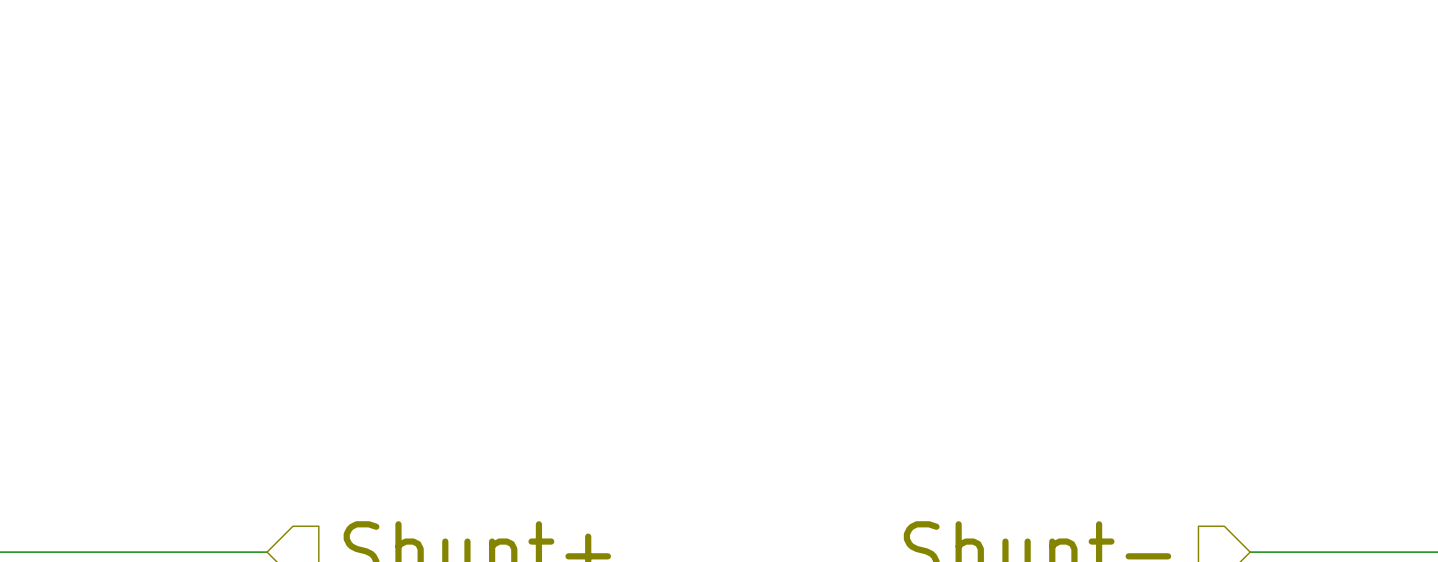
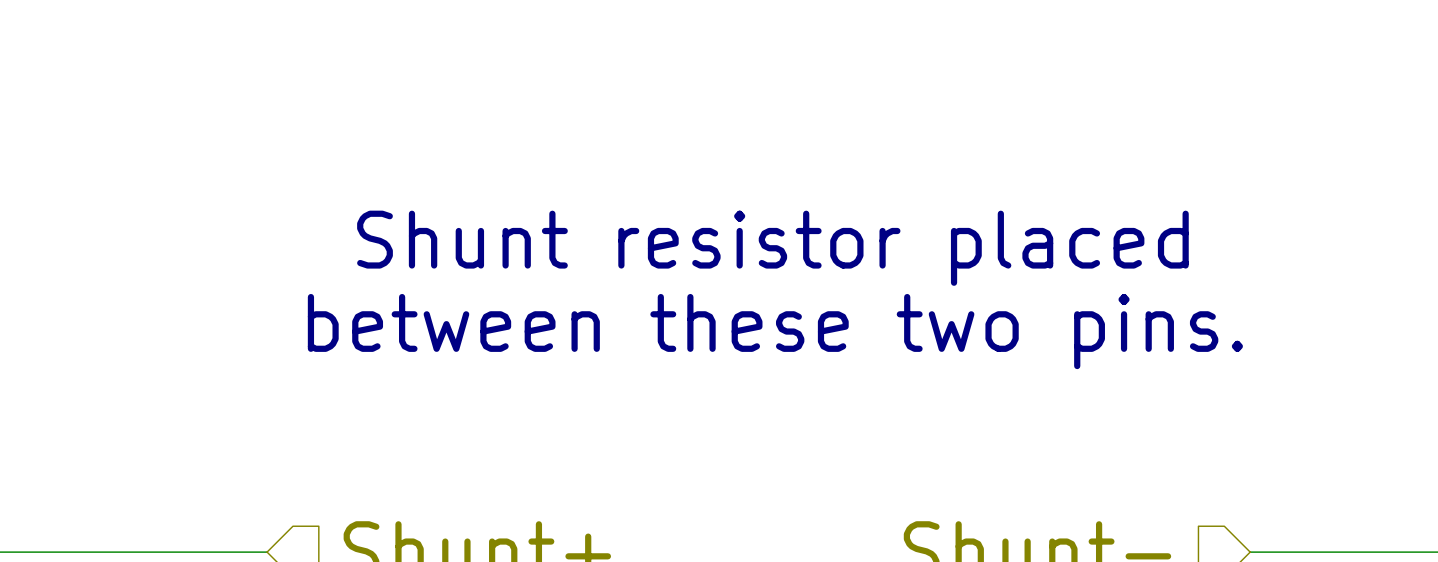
text: none -> Shunt resistor placed (772, 248)
text: none -> between these two pins. (775, 331)

